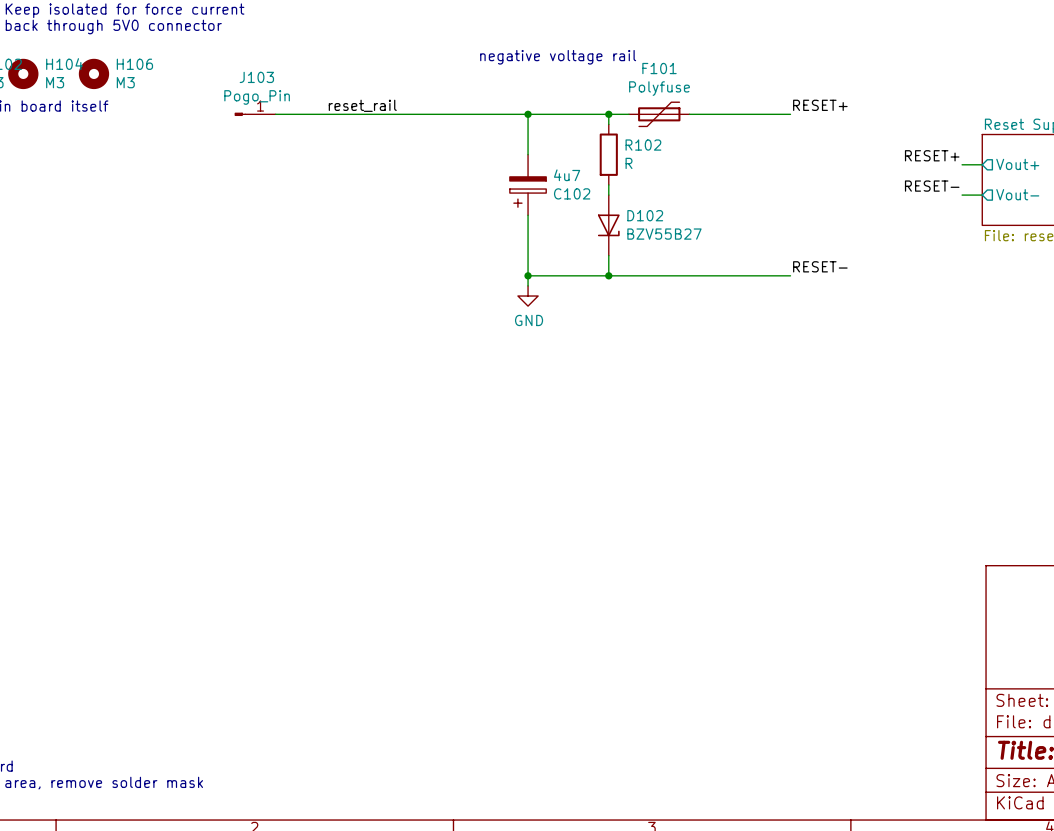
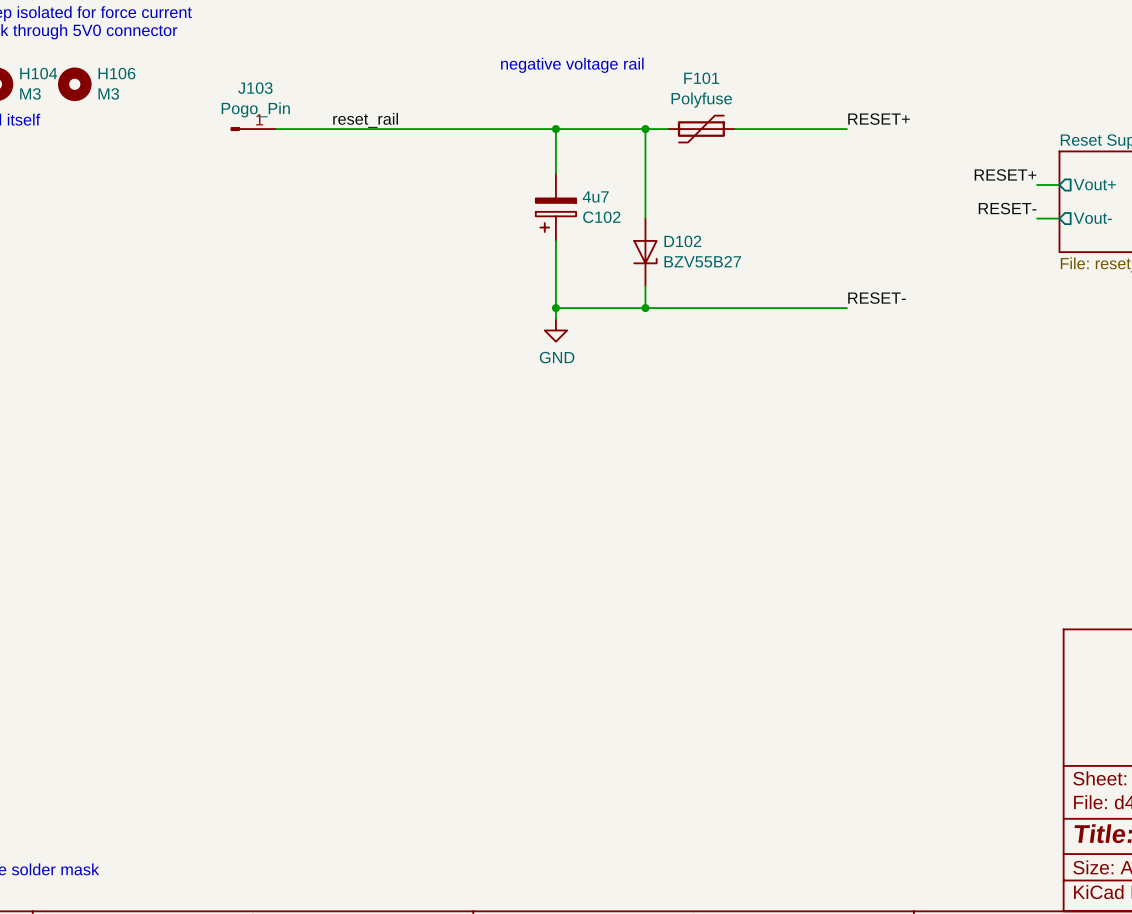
wire: none -> (645, 140) (645, 207)
R102: R (608, 154) -> none

